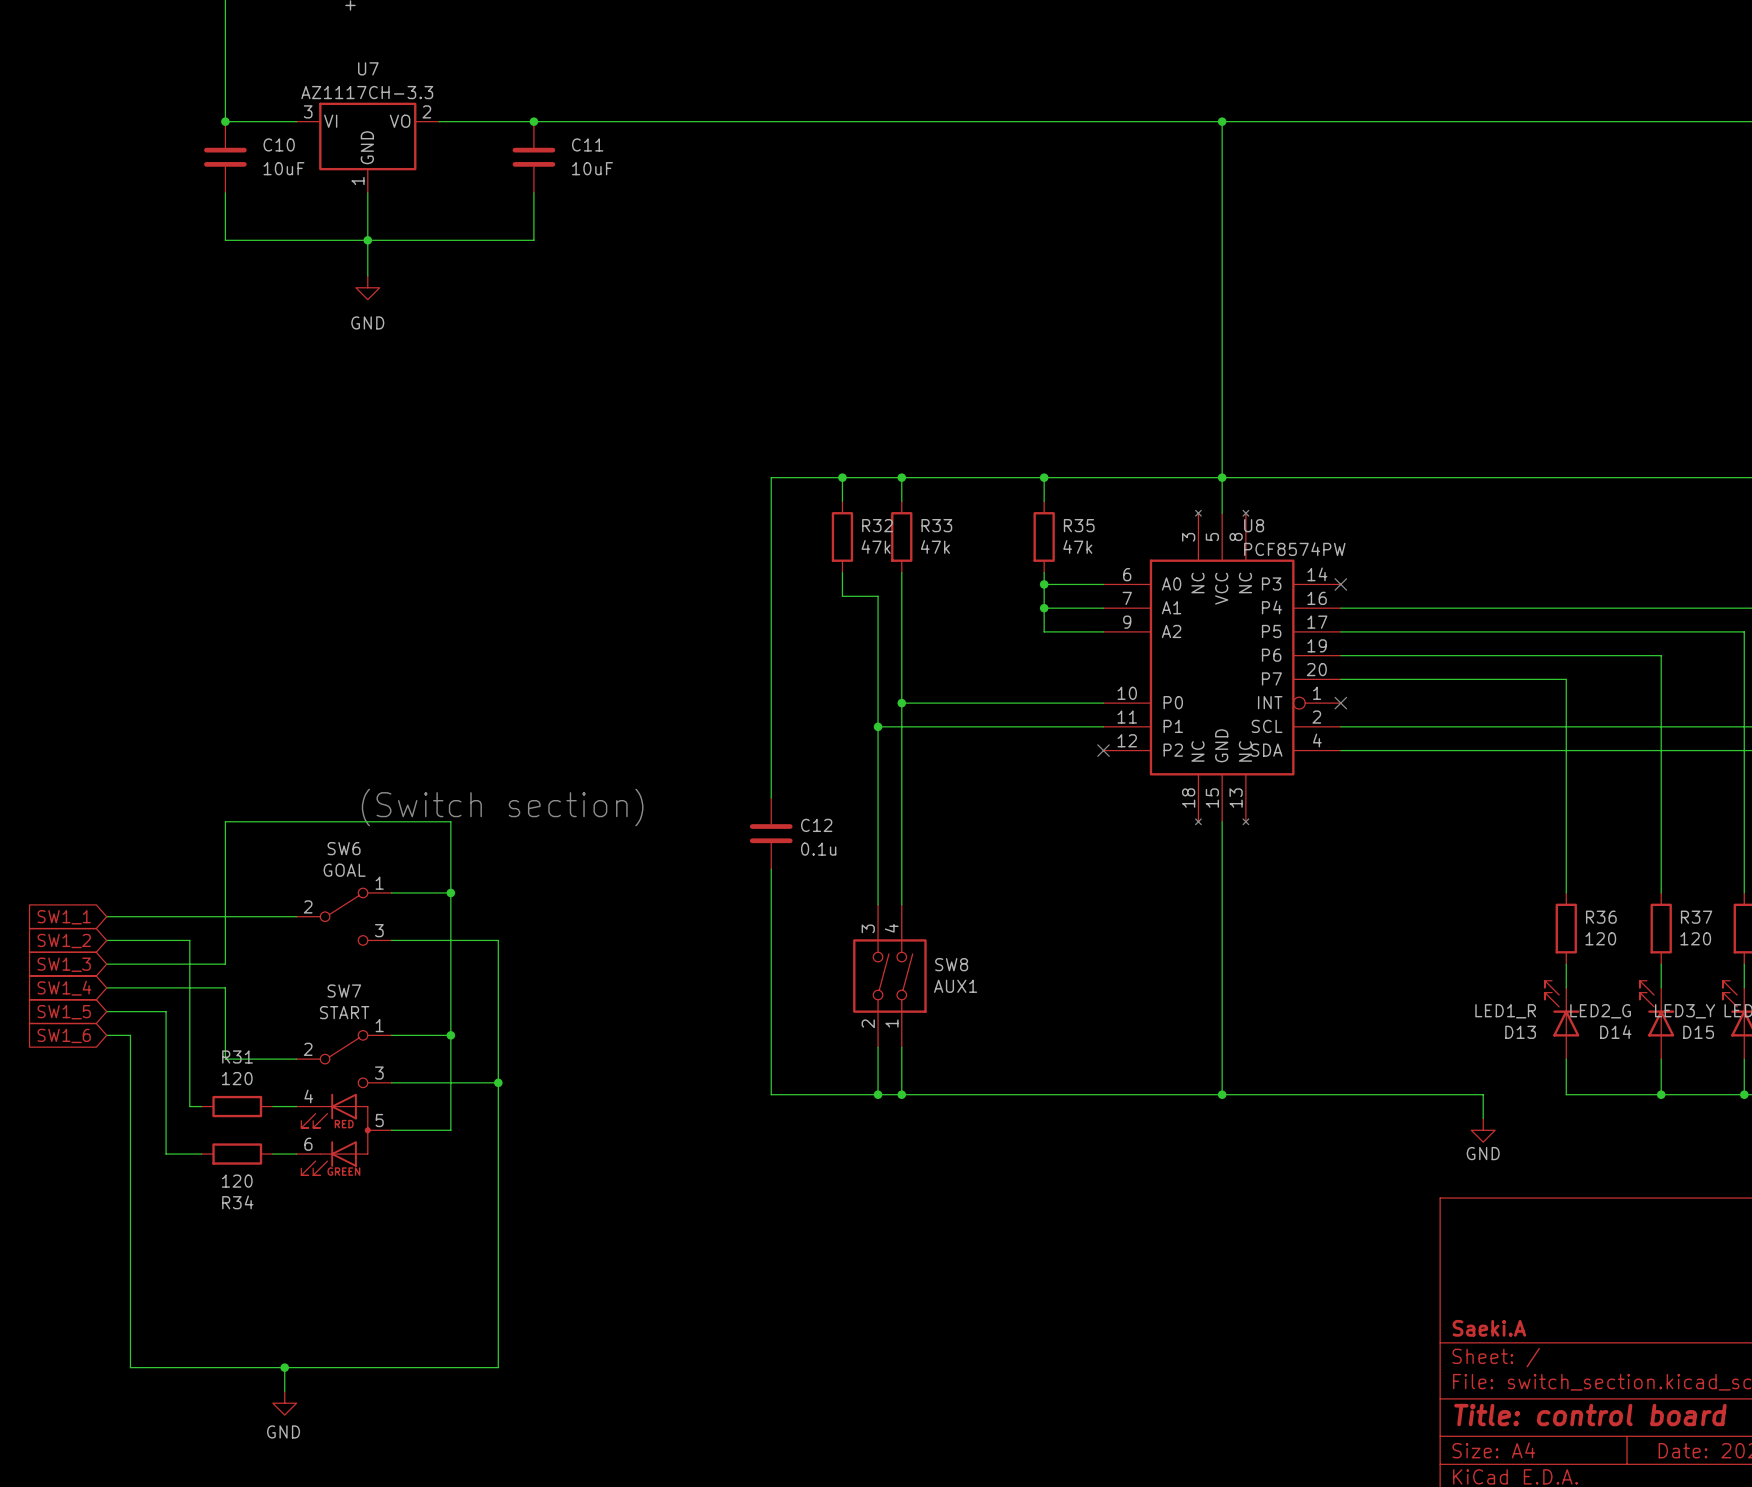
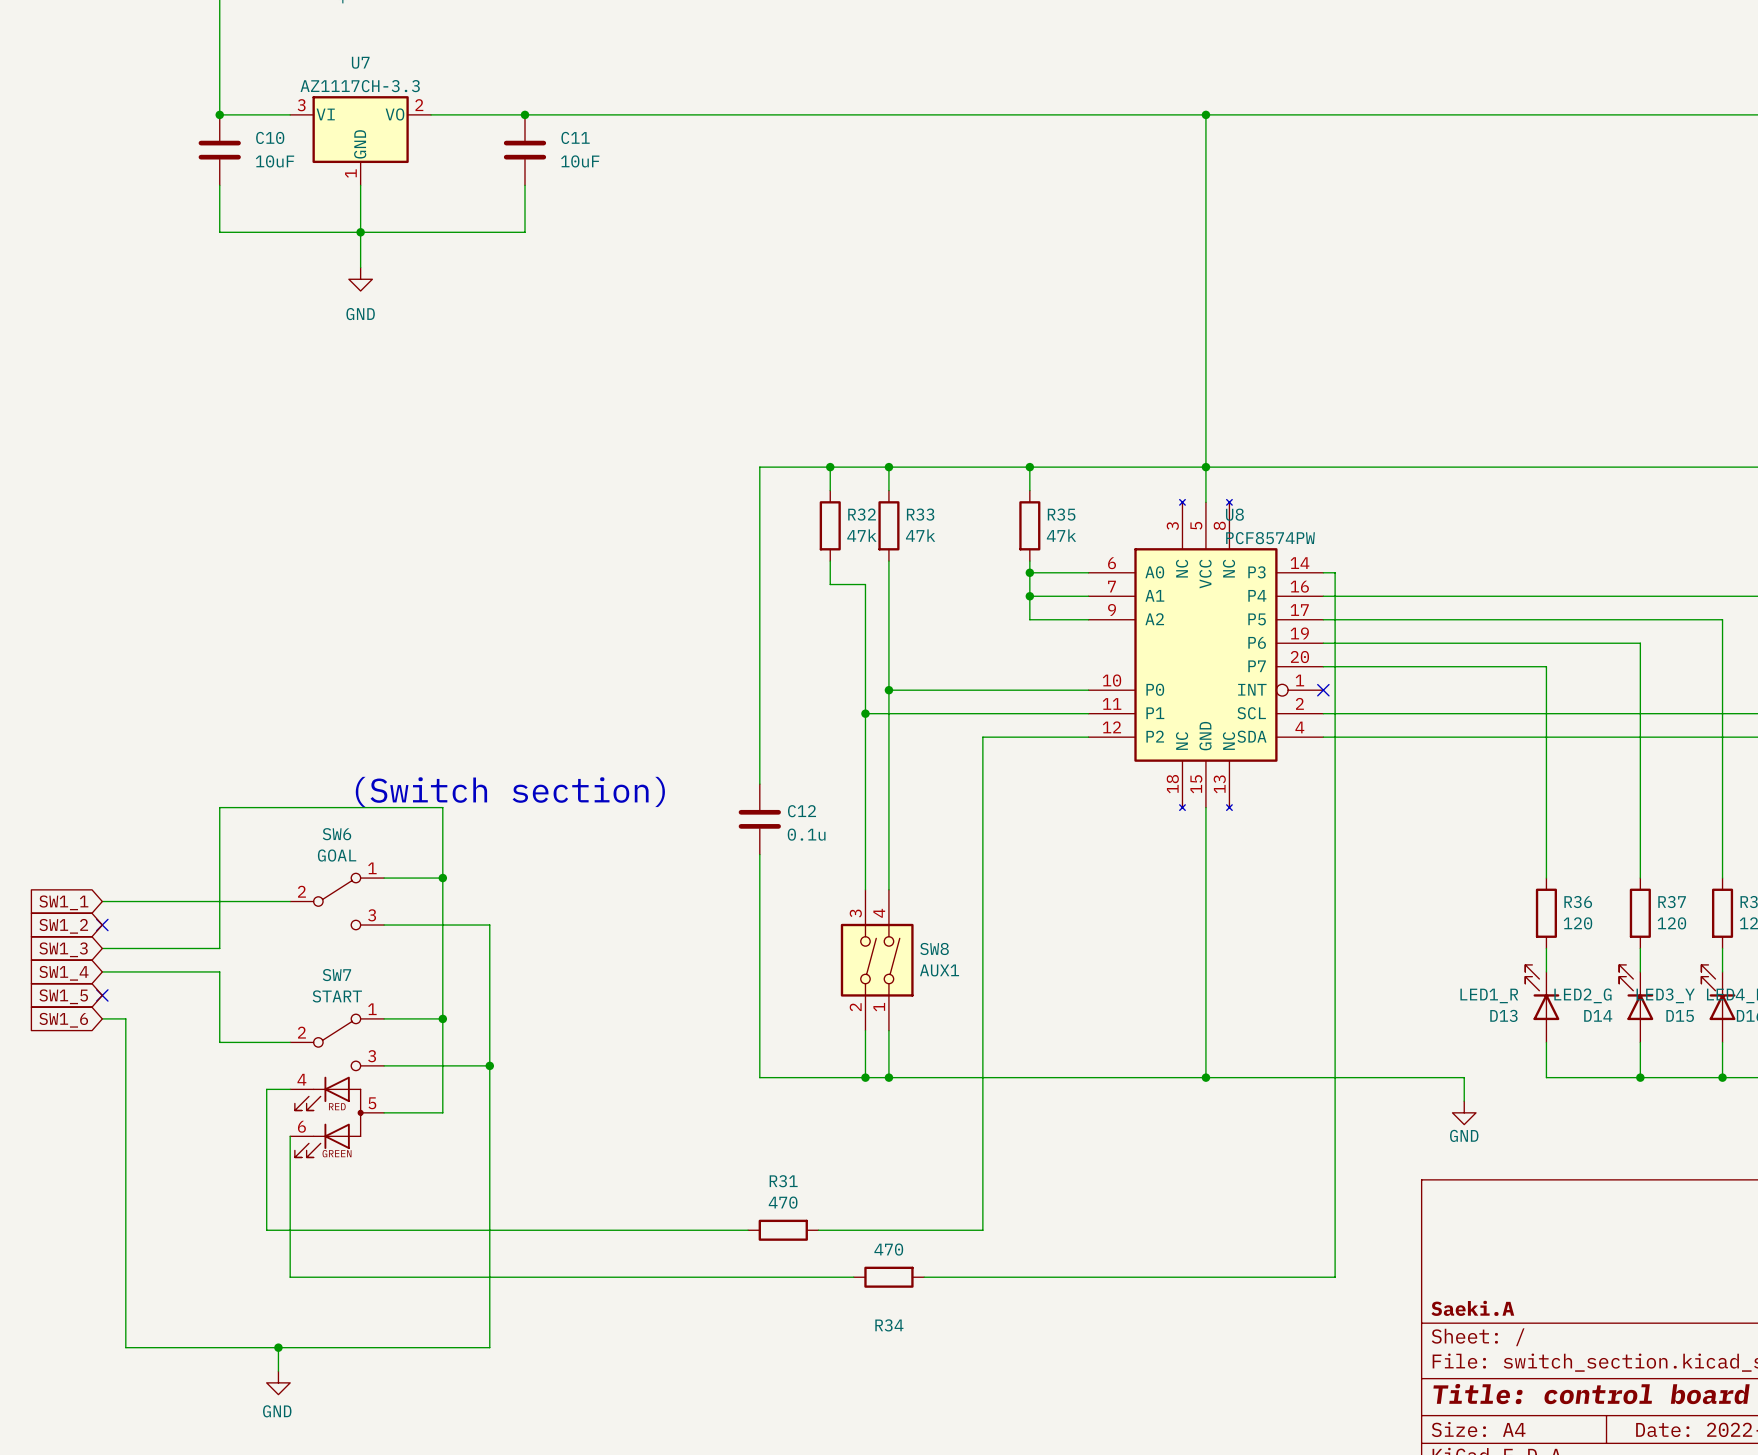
wire: none -> (1323, 572) (1335, 572) (1335, 1277) (924, 1277)
no-connect mark: (1340, 584) -> none
wire: none -> (1088, 737) (982, 737) (982, 1230) (818, 1230)
no-connect mark: (1103, 750) -> none
wire: (106, 940) (189, 940) (189, 1106) (201, 1106) -> none
no-connect mark: none -> (102, 925)
wire: (106, 1011) (166, 1011) (166, 1154) (201, 1154) -> none
no-connect mark: none -> (102, 995)
R31 value: 120 (237, 1078) -> 470 (783, 1202)
R31 position: (237, 1106) -> (783, 1230)
wire: none -> (266, 1089) (266, 1230) (748, 1230)
R34 position: (237, 1154) -> (888, 1277)
wire: (272, 1154) (296, 1154) -> (853, 1277) (290, 1277) (290, 1136)
R34 value: 120 (237, 1181) -> 470 (888, 1249)

